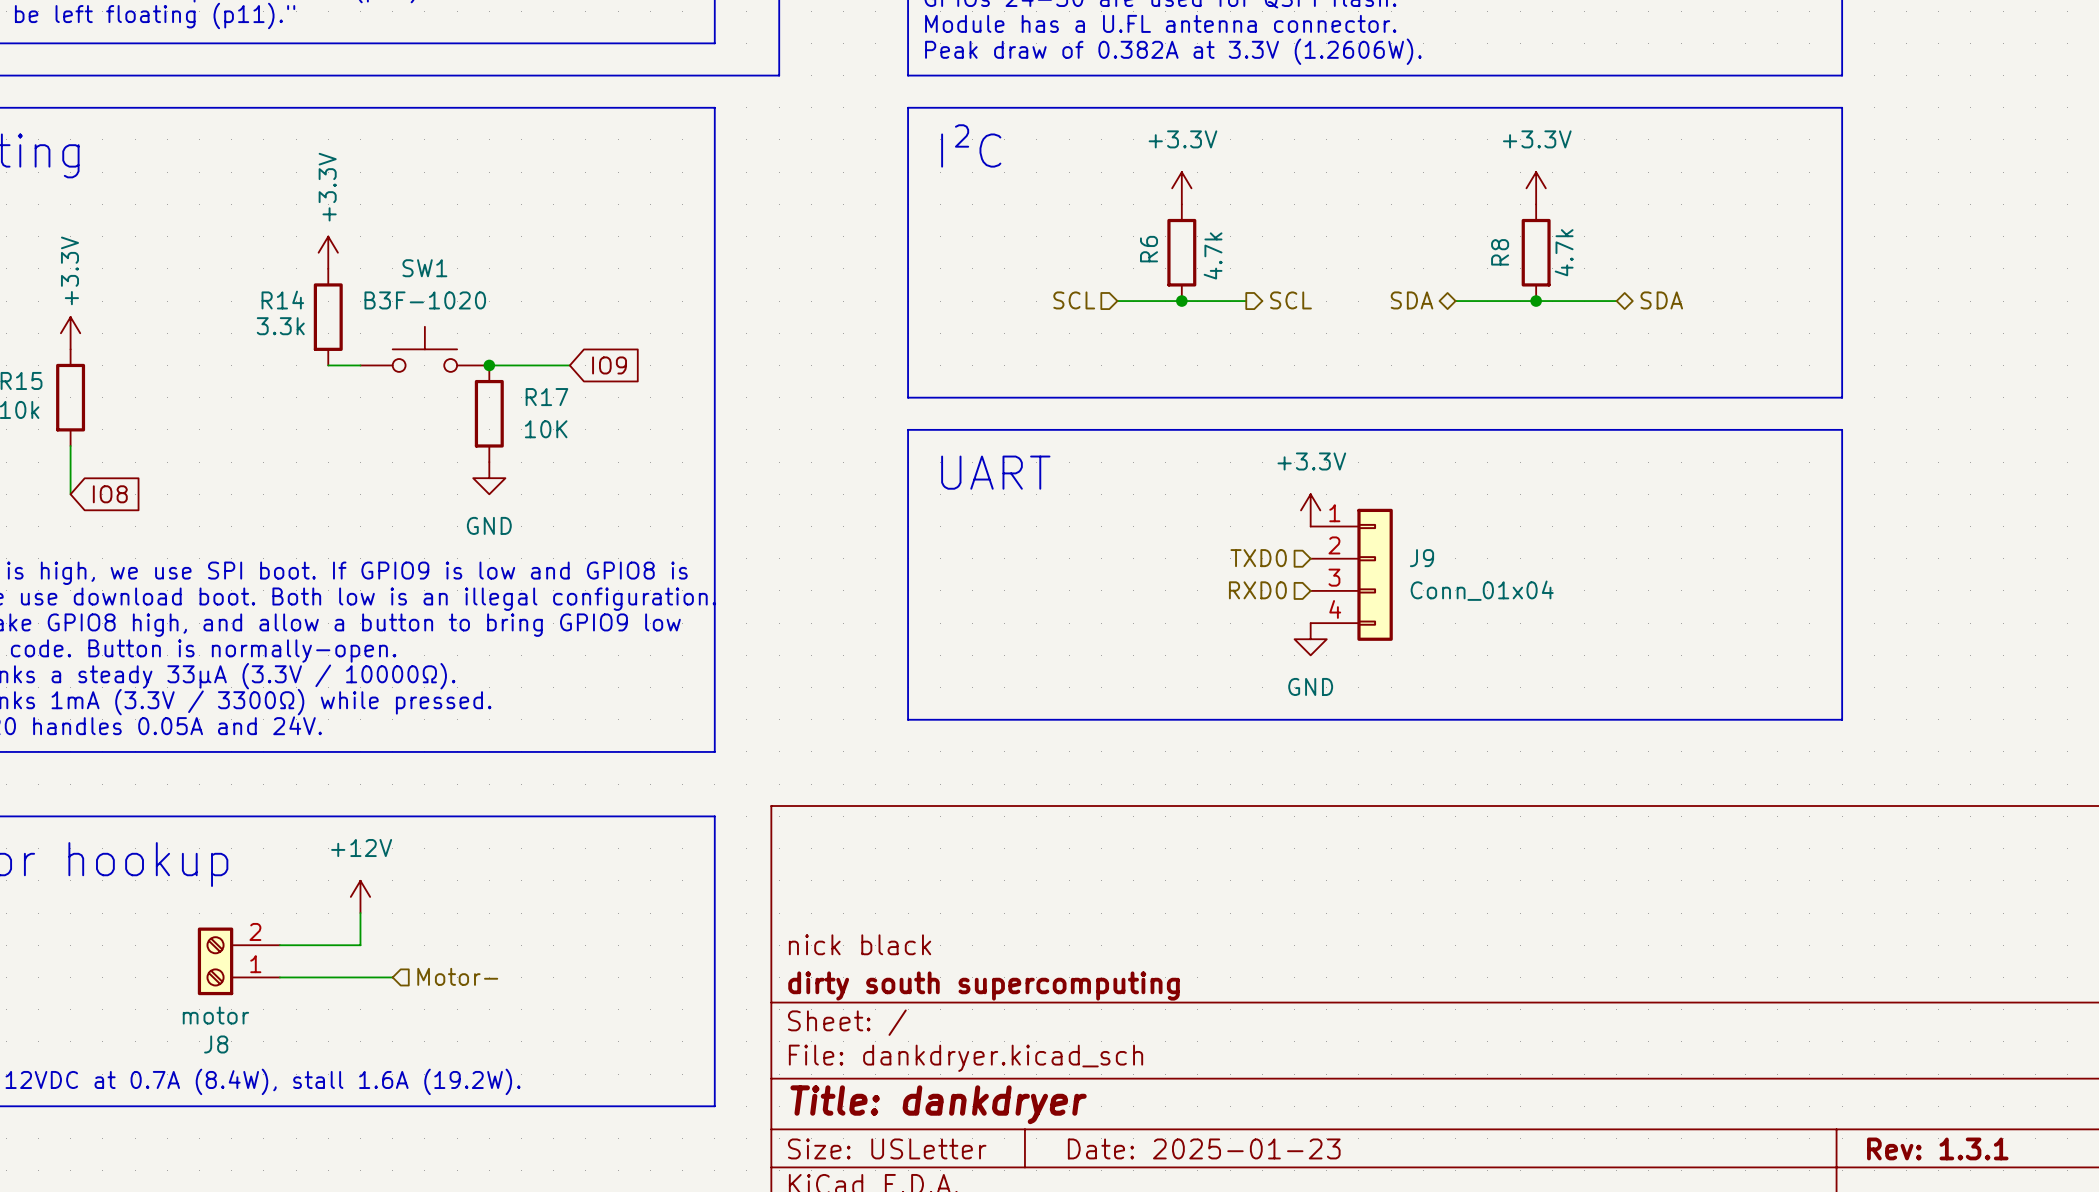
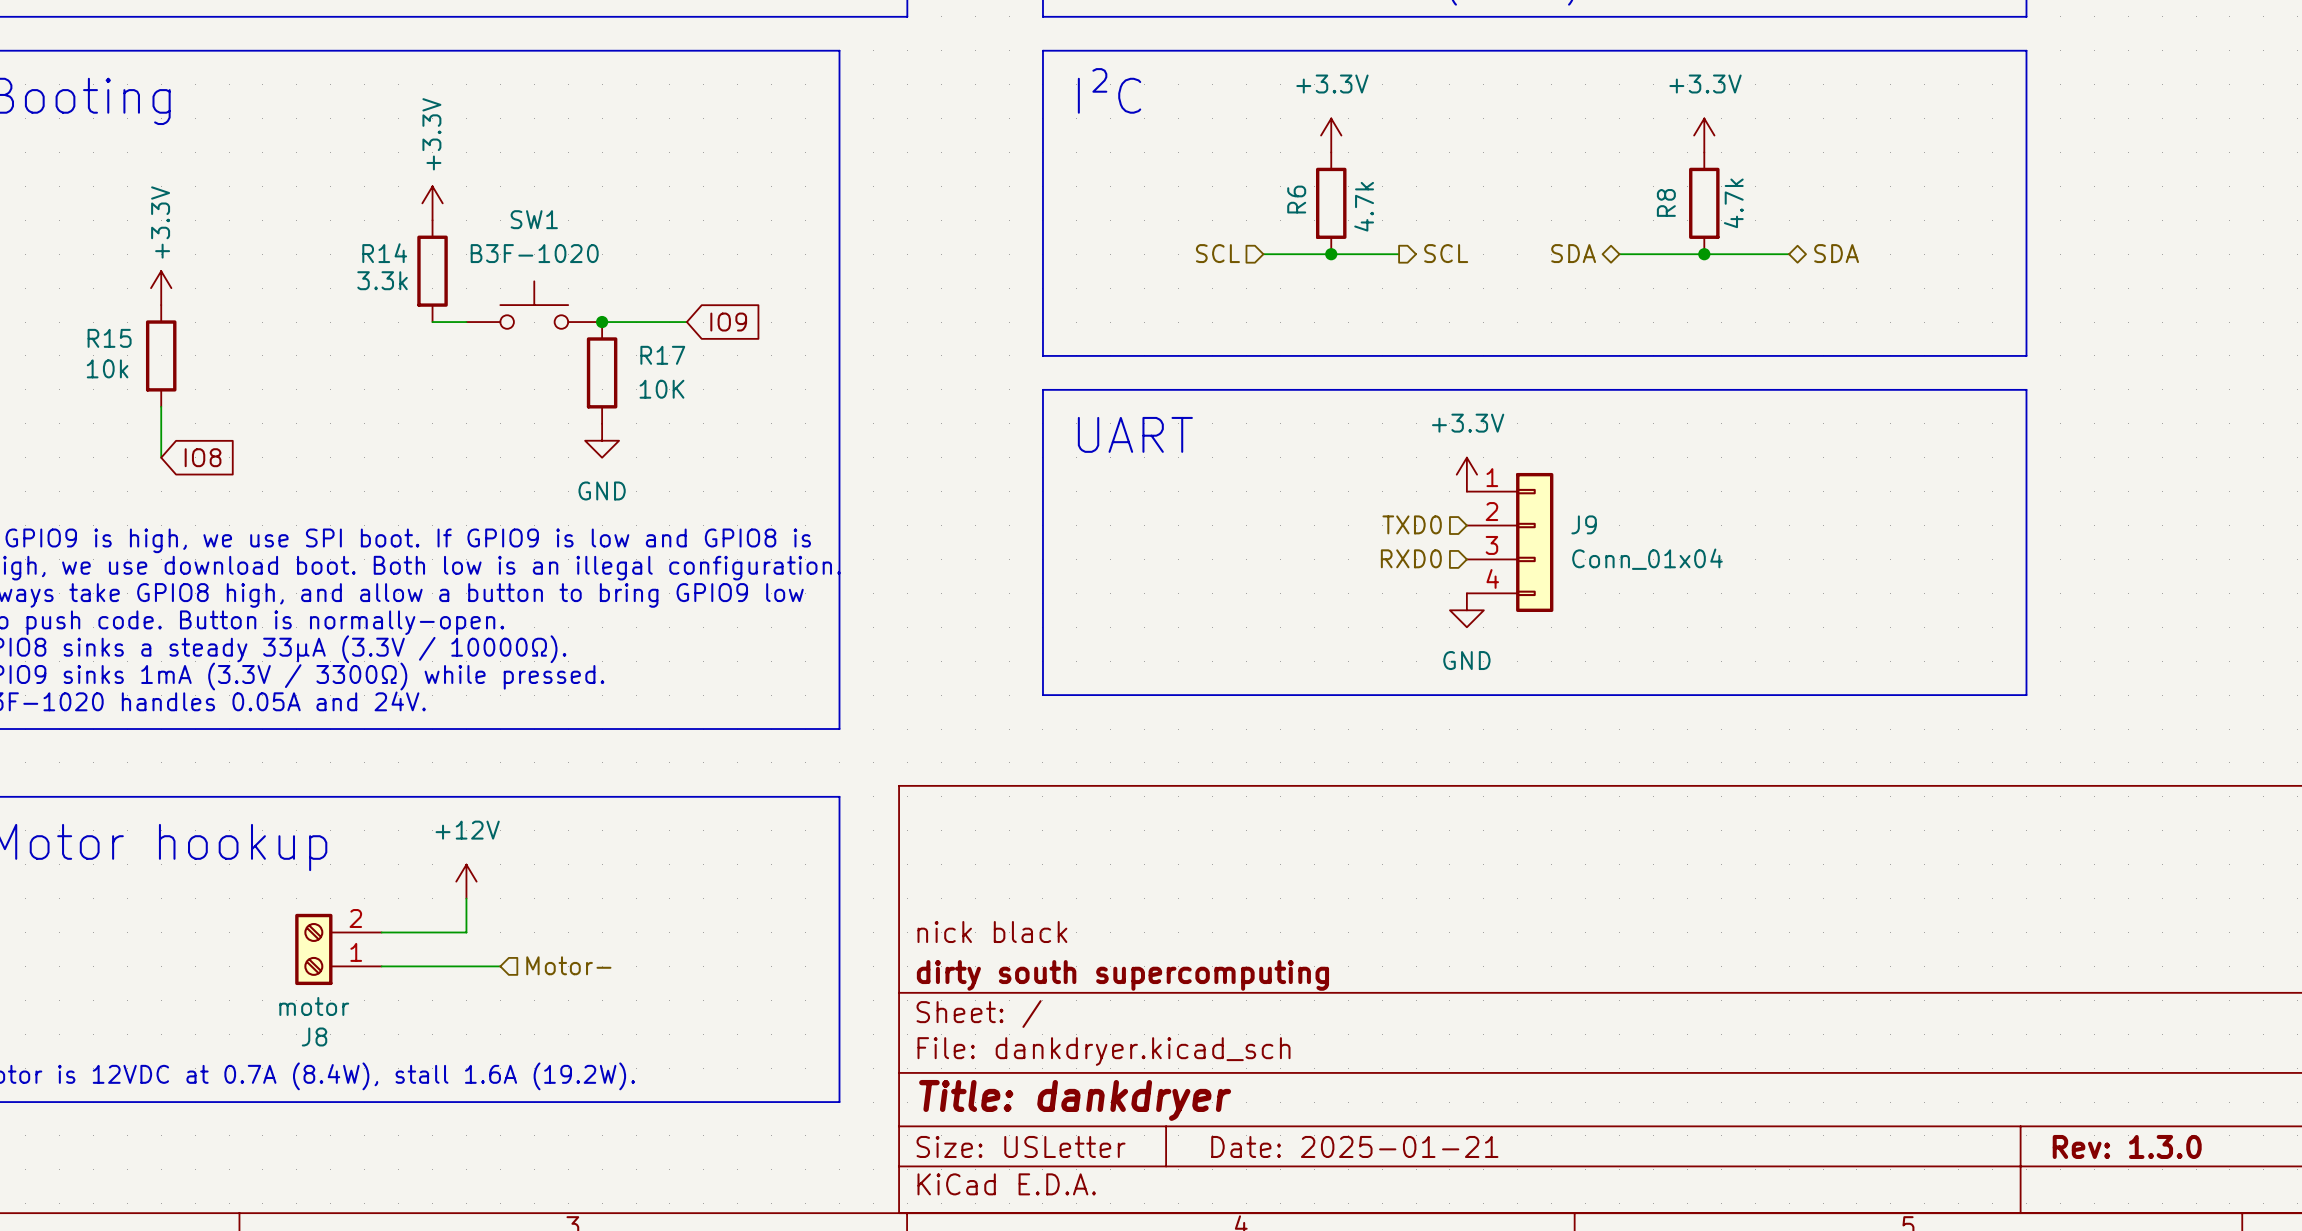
title block: Date: 2025-01-23 (1204, 1148) -> Date: 2025-01-21 (1354, 1146)
title block: Rev: 1.3.1 (1937, 1148) -> Rev: 1.3.0 (2127, 1146)

